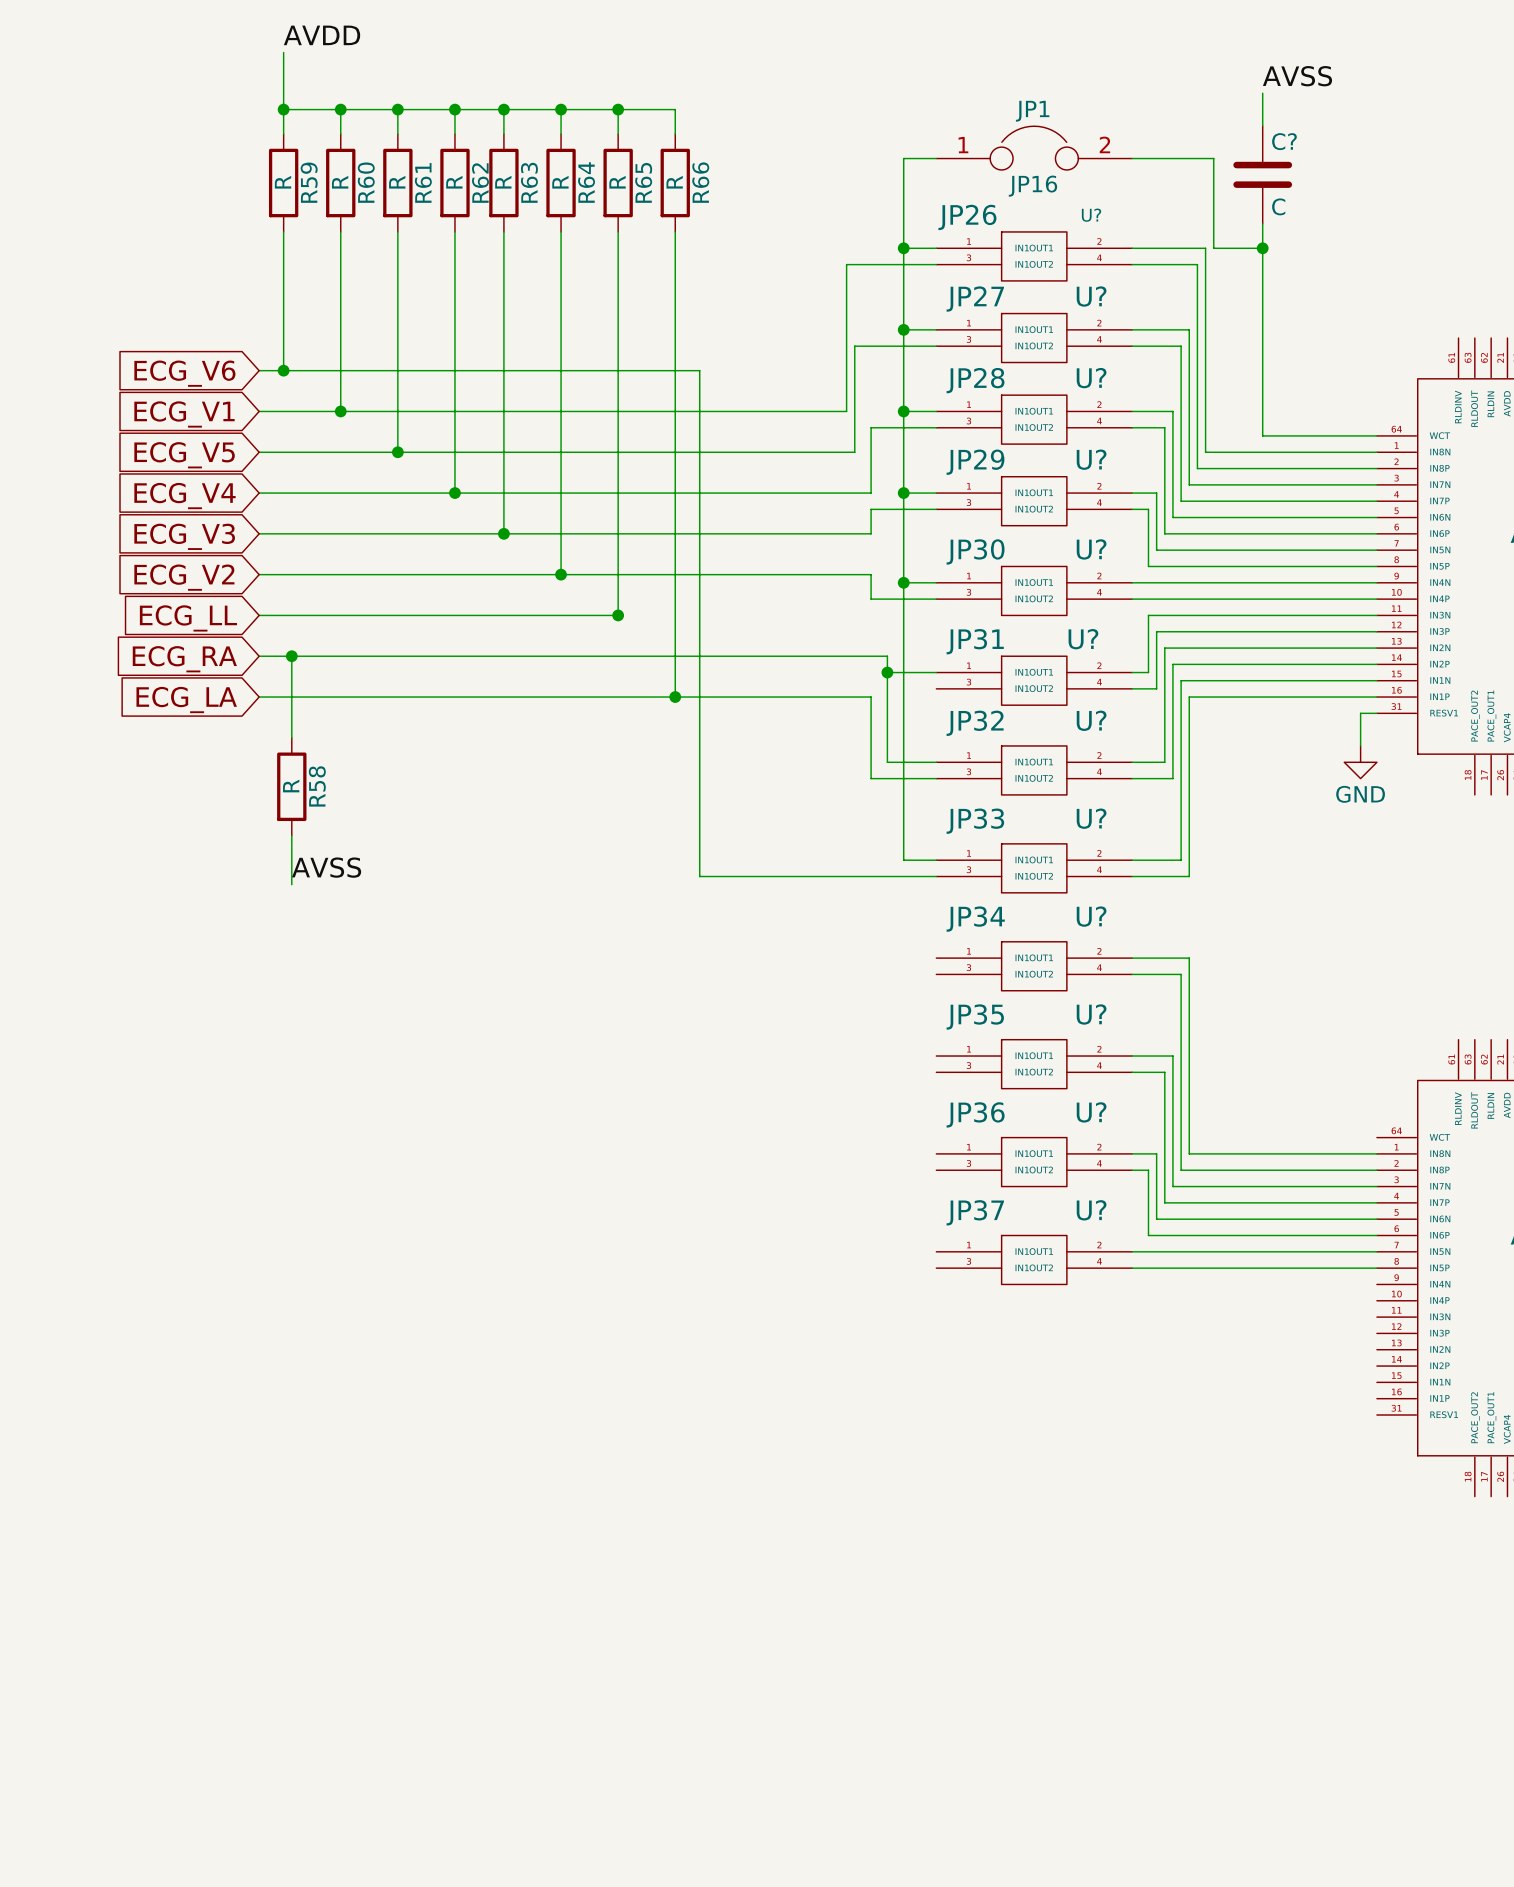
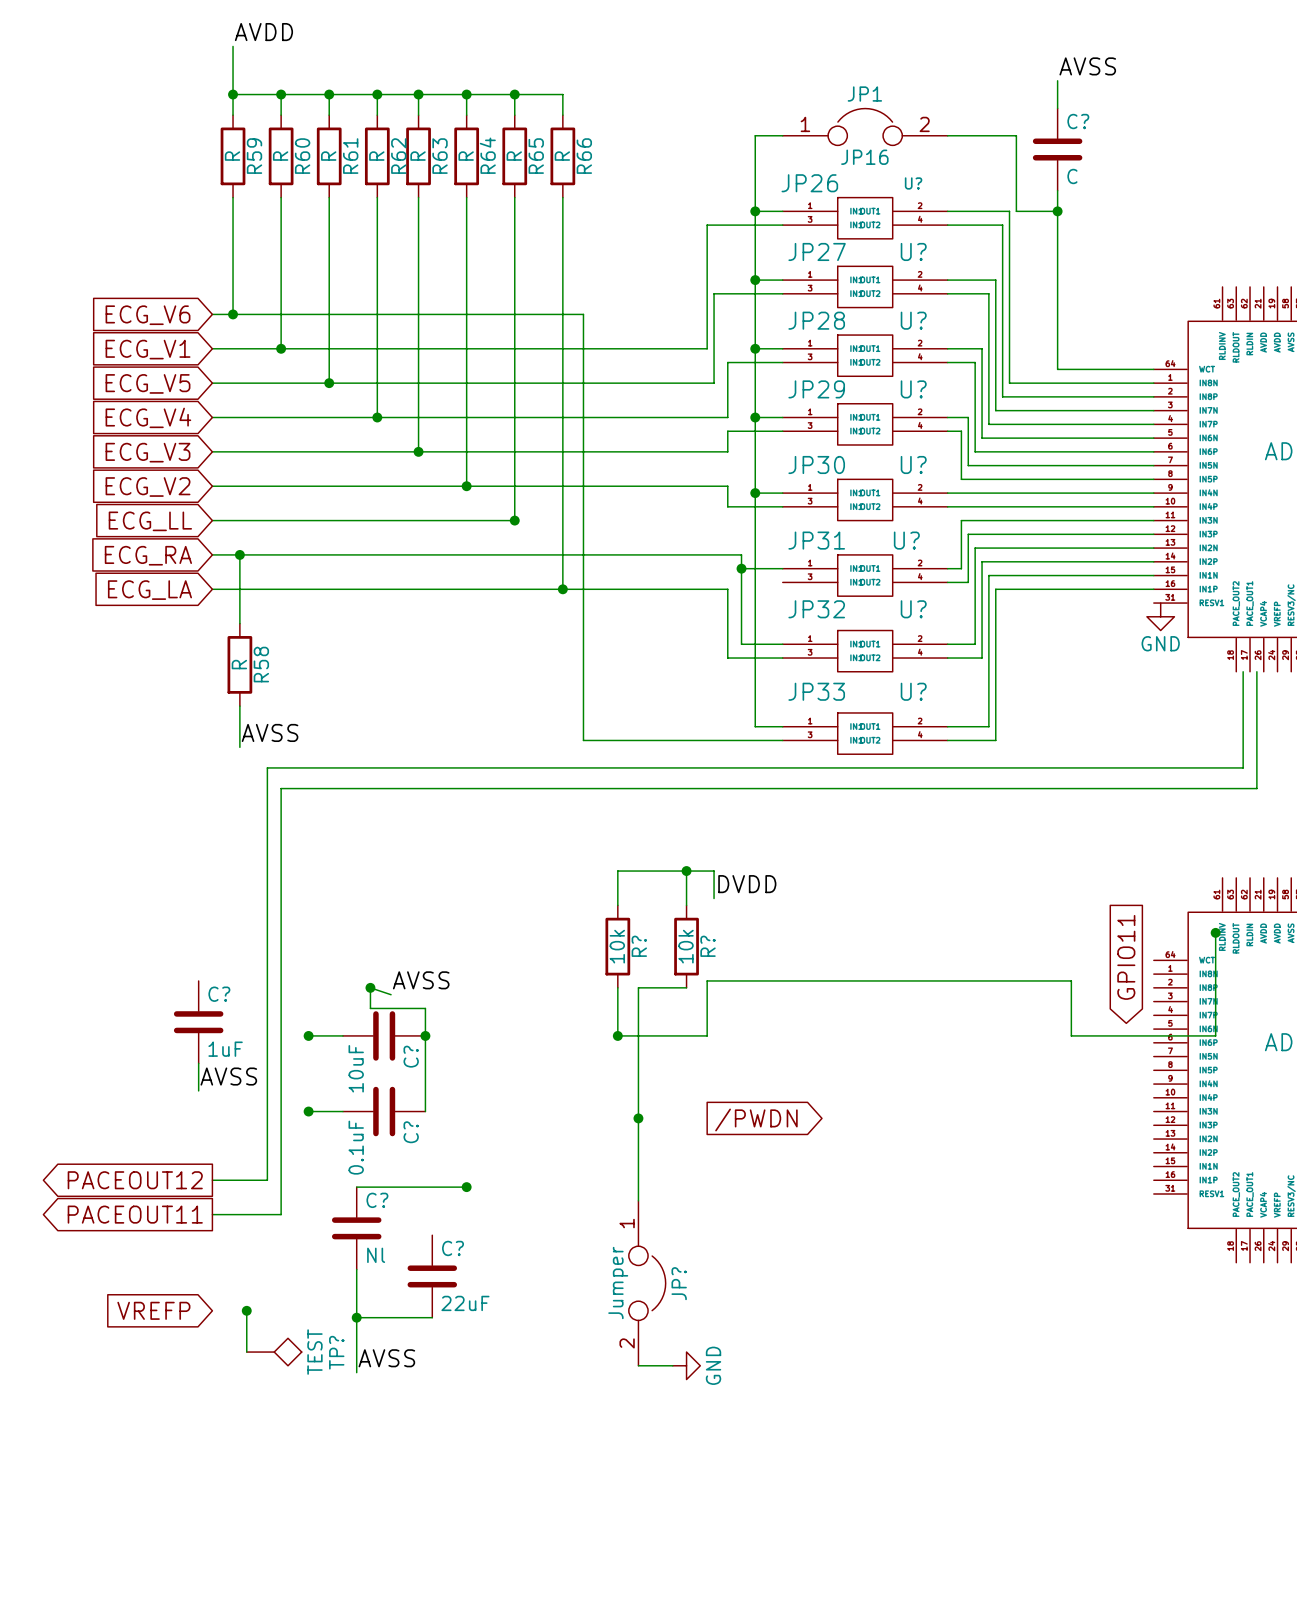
wire: (1376, 713) (1360, 713) (1360, 745) -> none
power symbol position: GND (1360, 762) -> GND (1160, 616)
wire: none -> (1243, 671) (1243, 767) (267, 767) (267, 1180) (212, 1180)
wire: none -> (1256, 671) (1256, 788) (281, 788) (281, 1214) (212, 1214)
wire: (1132, 958) (1189, 958) (1189, 1153) (1376, 1153) -> none
U?: JP34 (1034, 966) -> none
wire: (1132, 974) (1181, 974) (1181, 1170) (1376, 1170) -> none
wire: none -> (686, 871) (686, 905)
junction: none -> (686, 871)
label: none -> DVDD (747, 884)
wire: (1132, 1056) (1172, 1056) (1172, 1186) (1376, 1186) -> none
wire: none -> (714, 898) (714, 871) (617, 871) (617, 905)
U?: JP35 (1034, 1064) -> none
wire: (1132, 1072) (1164, 1072) (1164, 1202) (1376, 1202) -> none
wire: none -> (1215, 932) (1215, 1035) (1071, 1035) (1071, 980) (707, 980) (707, 1035) (617, 1035) (617, 987)
junction: none -> (1215, 932)
R?: none -> 10k (617, 946)
R?: none -> 10k (686, 946)
global label: none -> GPIO11 (1126, 957)
wire: (1132, 1153) (1156, 1153) (1156, 1219) (1376, 1219) -> none
label: none -> AVSS (421, 980)
U?: JP36 (1034, 1162) -> none
junction: none -> (370, 987)
wire: none -> (686, 987) (638, 987) (638, 1200)
wire: (1132, 1170) (1148, 1170) (1148, 1235) (1376, 1235) -> none
wire: none -> (391, 994) (370, 987) (370, 1008) (425, 1008) (425, 1111)
C?: none -> 1uF (198, 1022)
wire: none -> (308, 1035) (342, 1035)
junction: none -> (308, 1035)
C?: none -> 10uF (384, 1035)
junction: none -> (425, 1035)
junction: none -> (617, 1035)
wire: (1132, 1251) (1376, 1251) -> none
wire: none -> (198, 1063) (198, 1090)
U?: JP37 (1034, 1259) -> none
wire: (1132, 1268) (1376, 1268) -> none
label: none -> AVSS (228, 1076)
wire: none -> (308, 1111) (342, 1111)
junction: none -> (308, 1111)
C?: none -> 0.1uF (384, 1111)
junction: none -> (638, 1118)
global label: none -> /PWDN (756, 1119)
global label: none -> PACEOUT12 (135, 1180)
wire: none -> (356, 1187) (466, 1187)
junction: none -> (466, 1187)
global label: none -> PACEOUT11 (135, 1214)
C?: none -> Nl (356, 1228)
wire: none -> (356, 1269) (356, 1372)
C?: none -> 22uF (432, 1276)
JP?: none -> Jumper (647, 1283)
global label: none -> VREFP (153, 1310)
wire: none -> (246, 1310) (246, 1352)
junction: none -> (246, 1310)
wire: none -> (356, 1317) (432, 1317)
junction: none -> (356, 1317)
TP?: none -> TEST (274, 1352)
label: none -> AVSS (386, 1358)
wire: none -> (638, 1365) (672, 1365)
power symbol: none -> GND (686, 1365)

